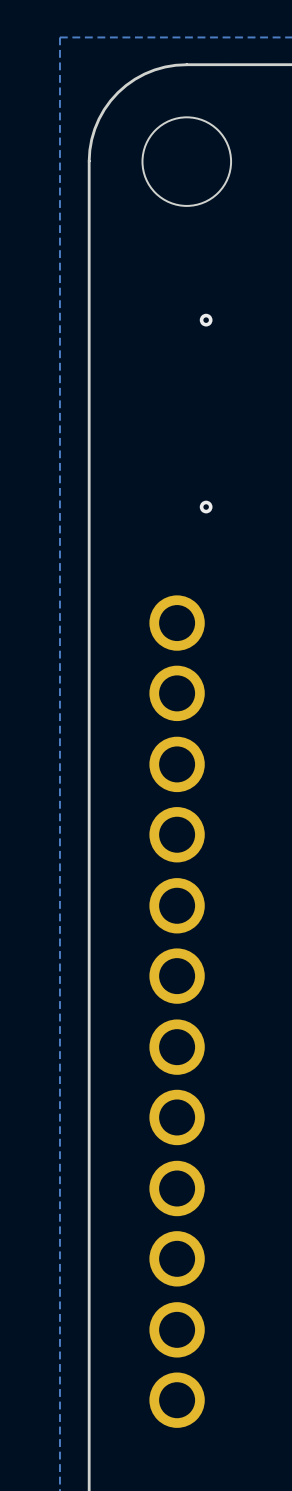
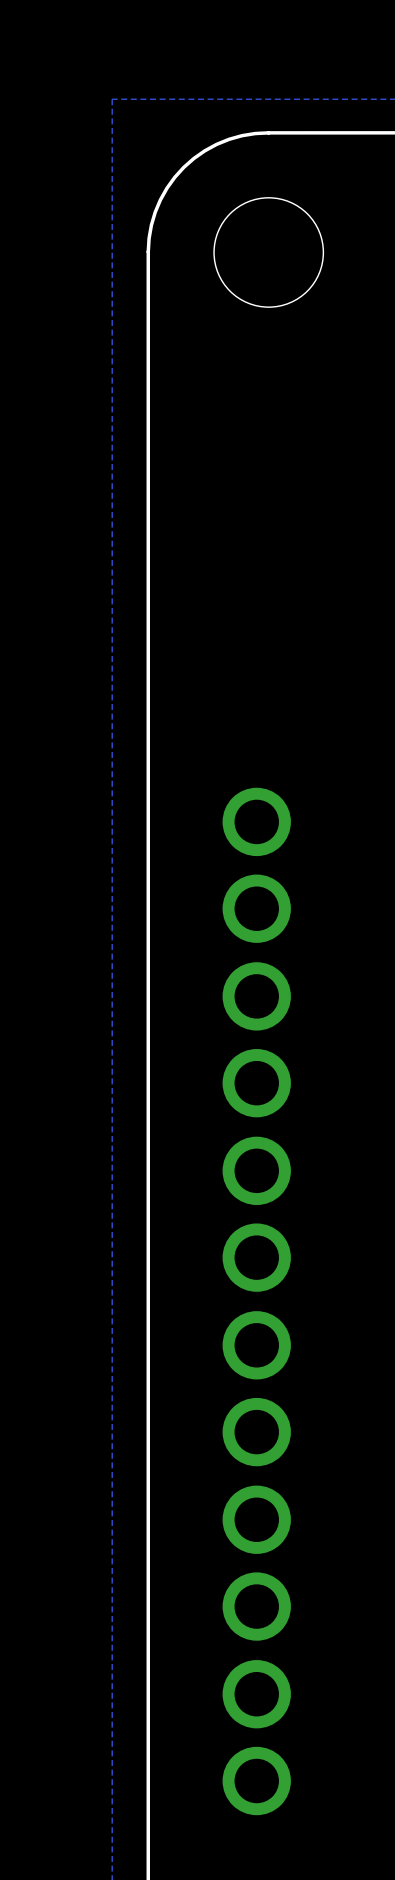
via: (206, 320) -> none
via: (206, 507) -> none

